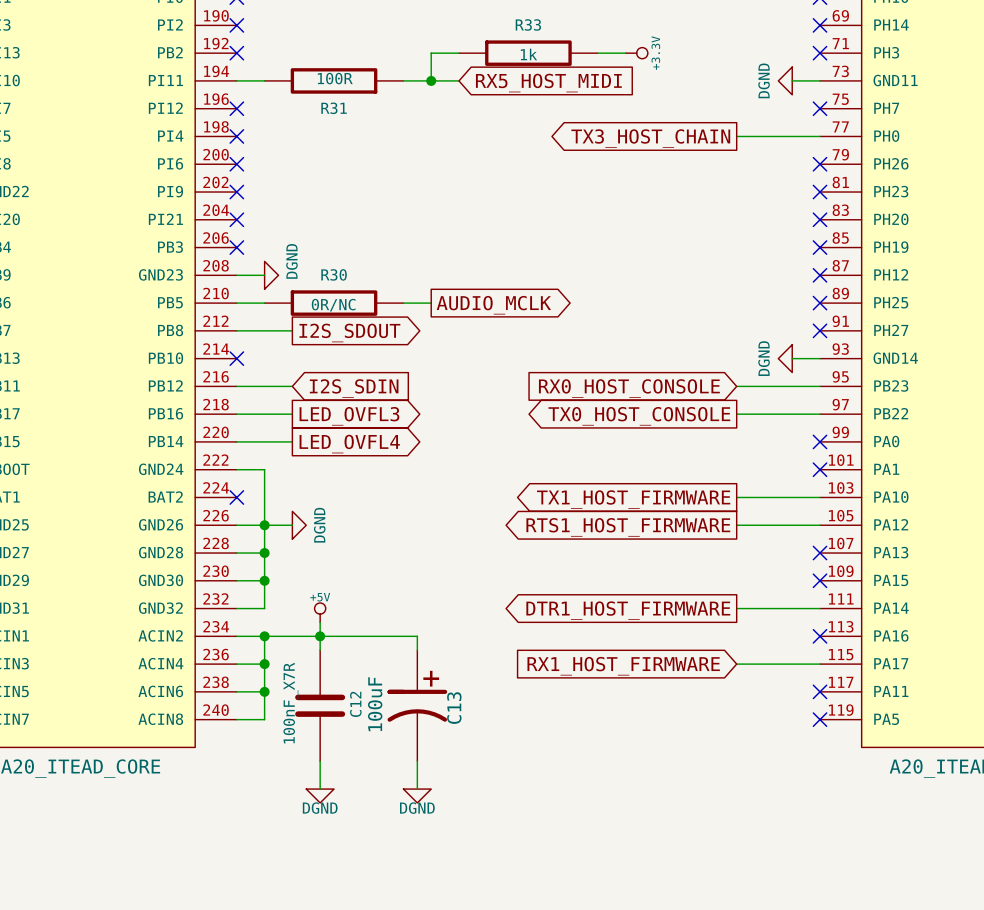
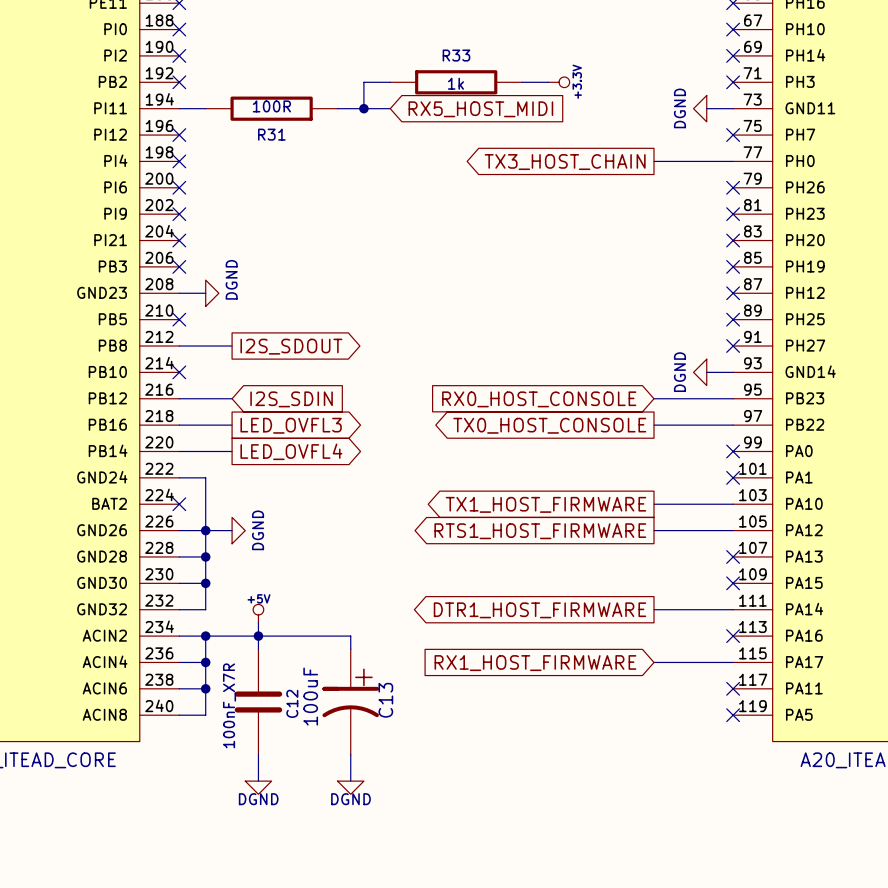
wire: (236, 303) (264, 303) -> none
no-connect mark: none -> (179, 319)
R30: 0R/NC (334, 303) -> none
wire: (403, 303) (431, 303) -> none
global label: AUDIO_MCLK (493, 305) -> none

